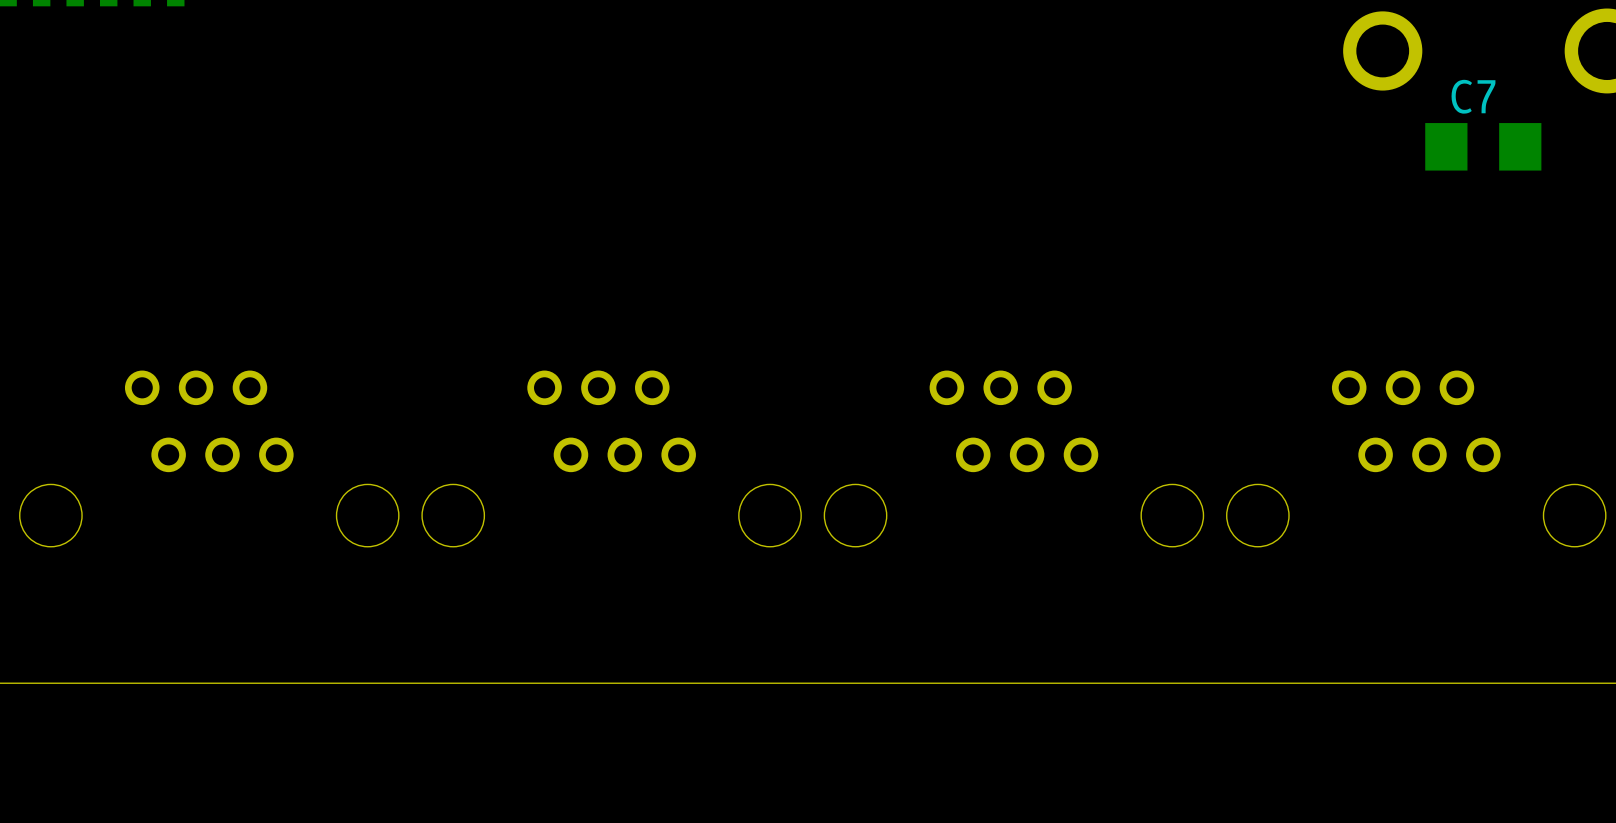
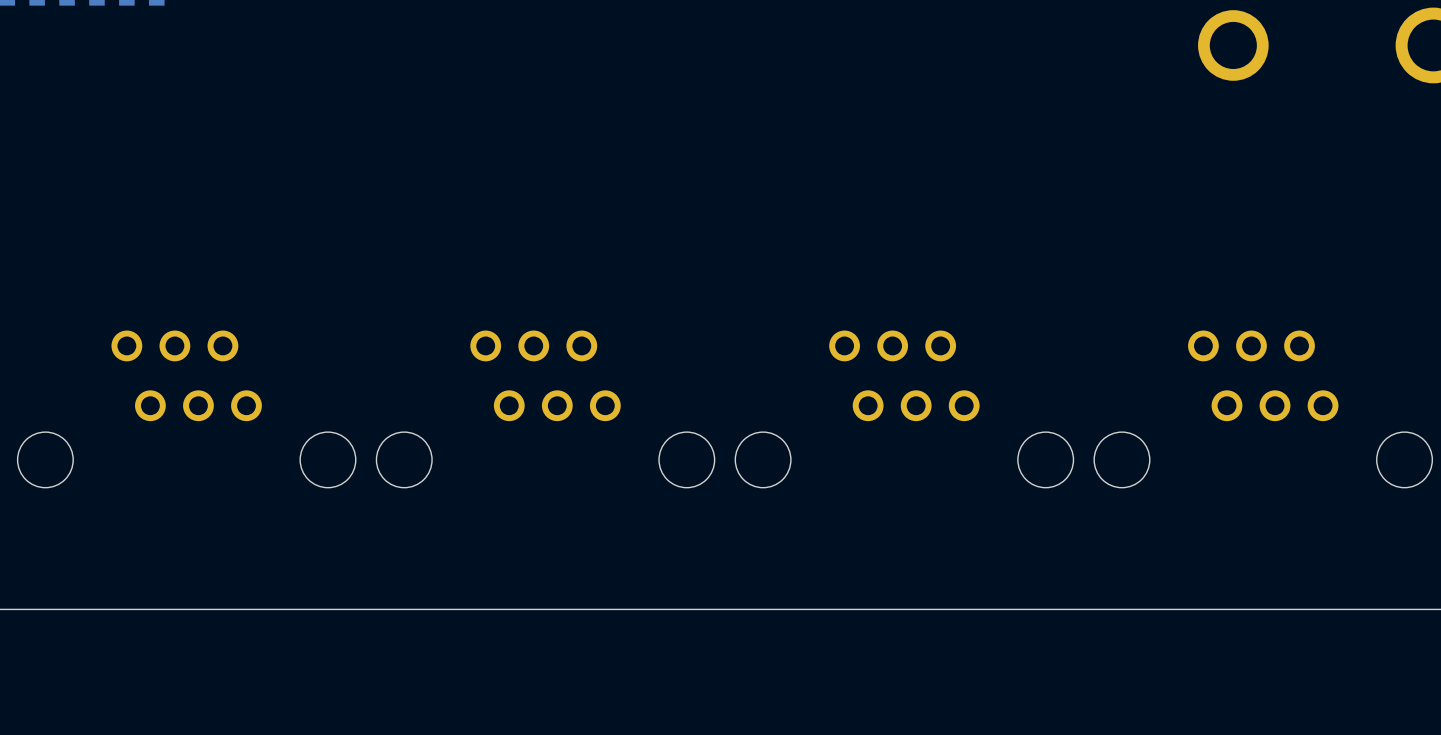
C7: (1483, 146) -> none

